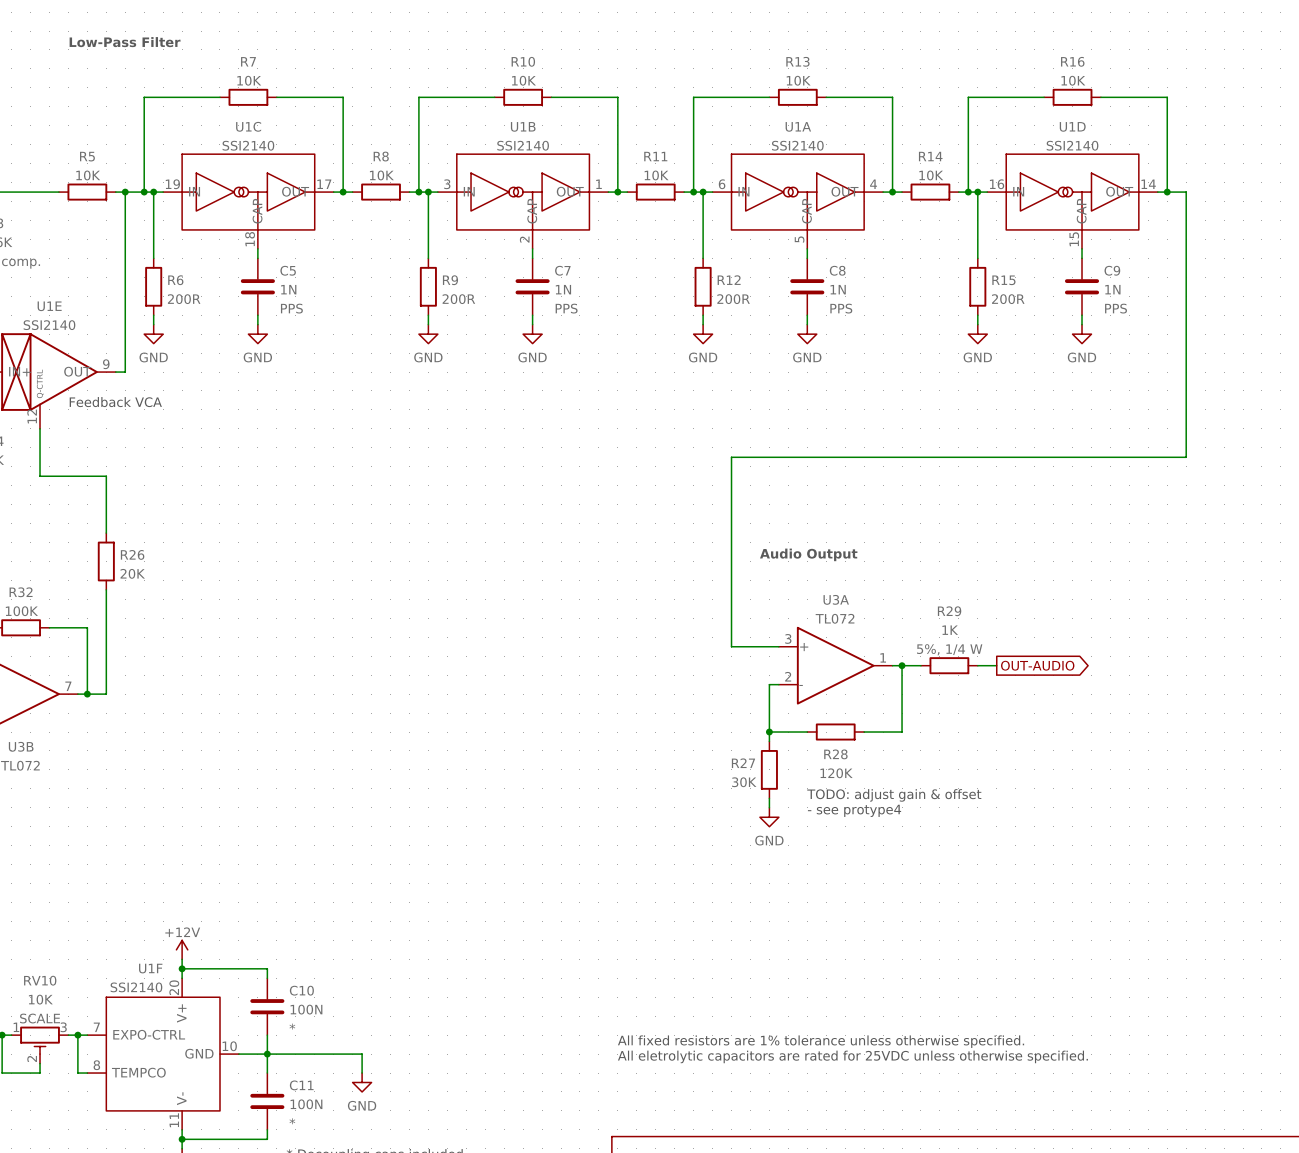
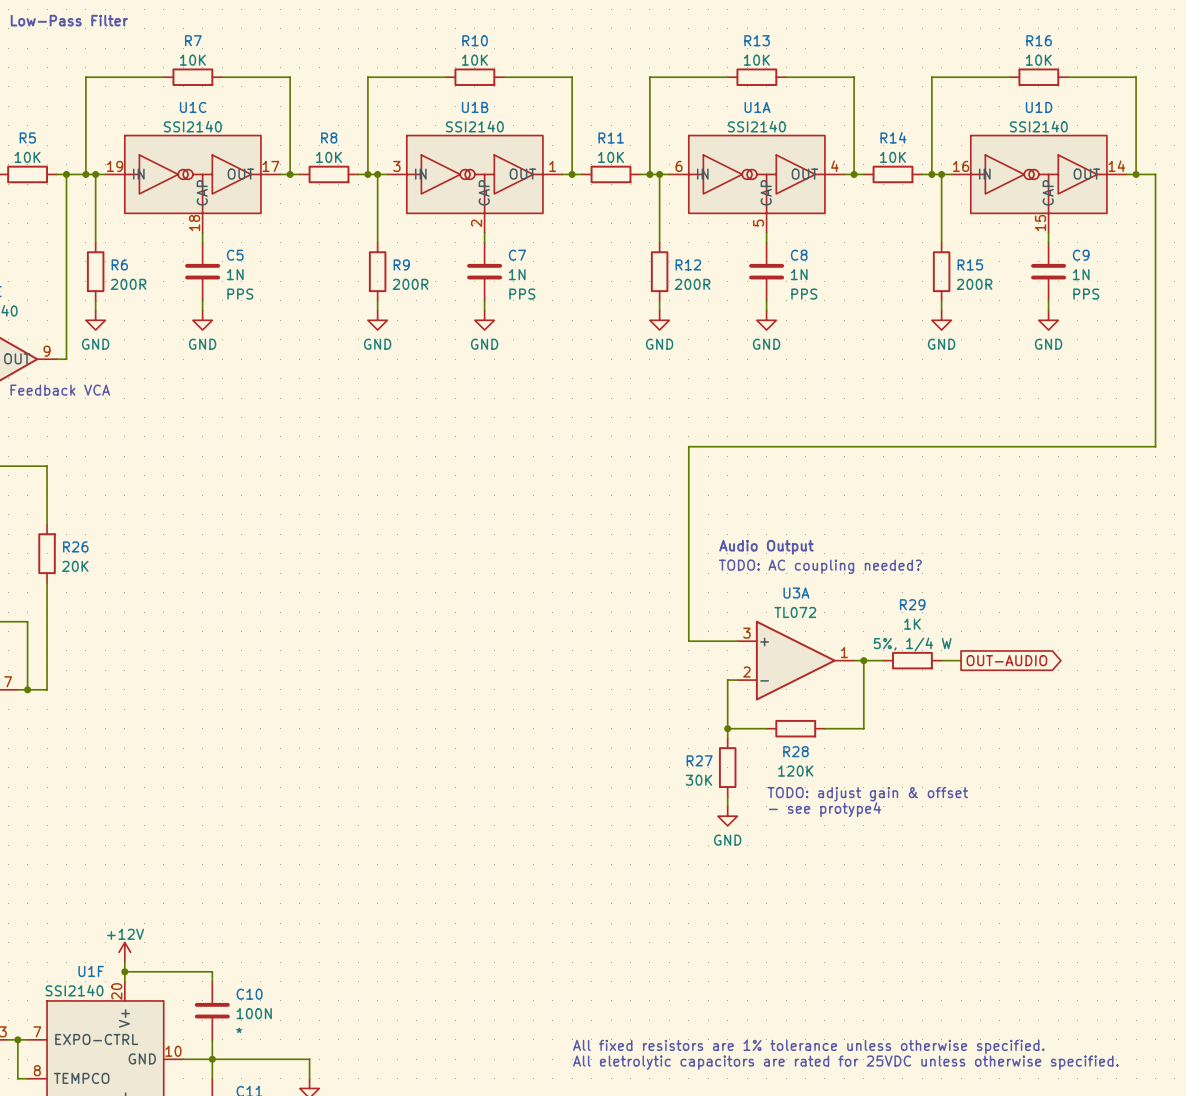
text: none -> TODO: AC coupling needed? (820, 566)

